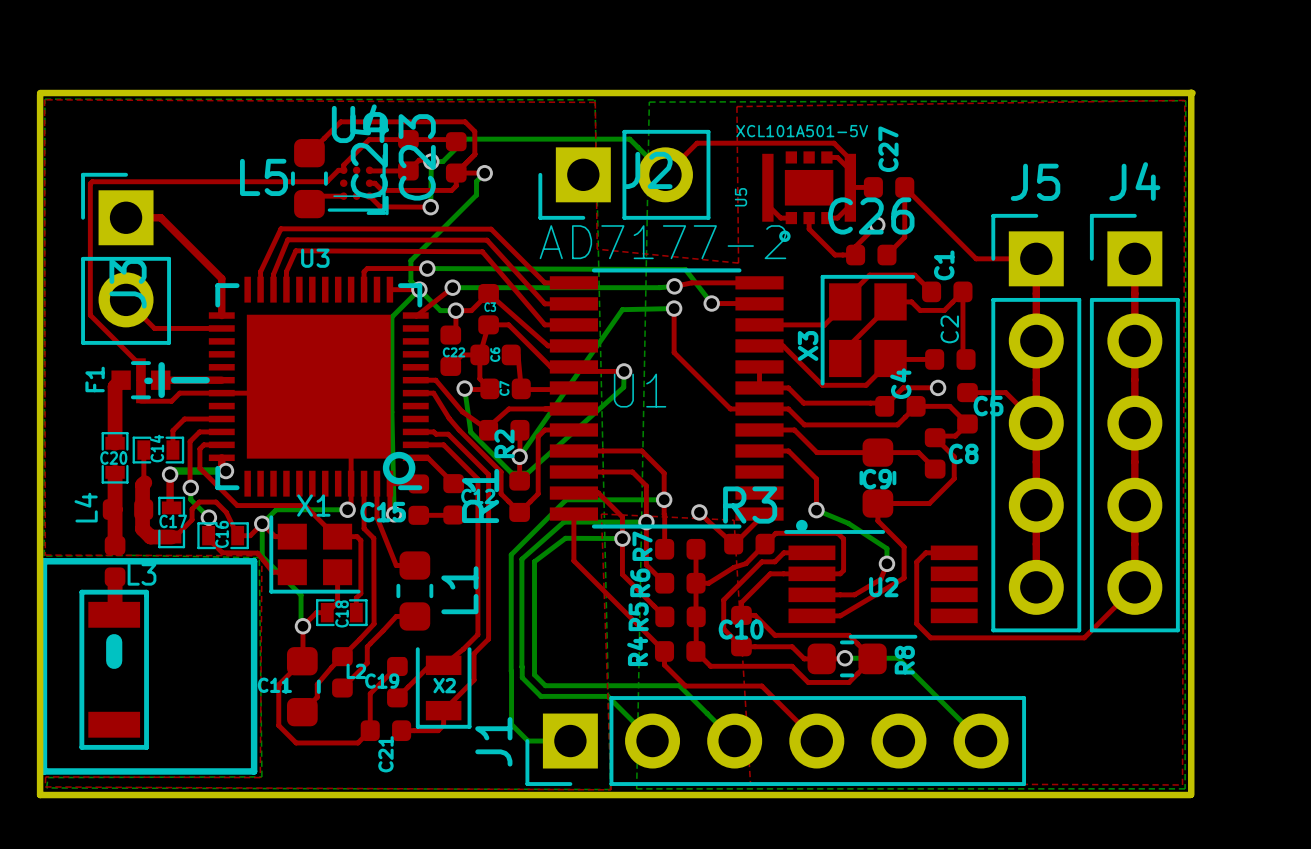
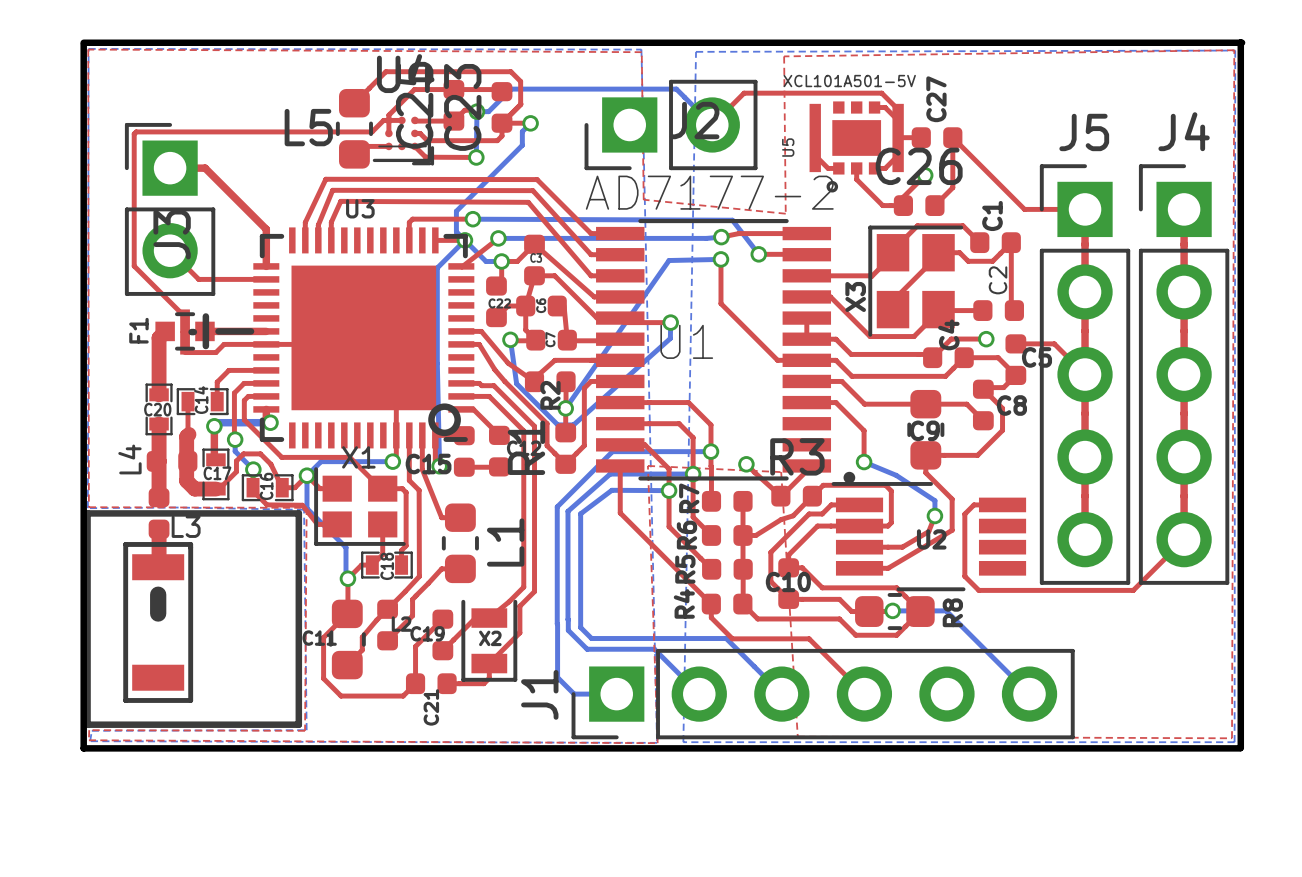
top track: none -> (401, 120) (388, 120) (388, 133)

